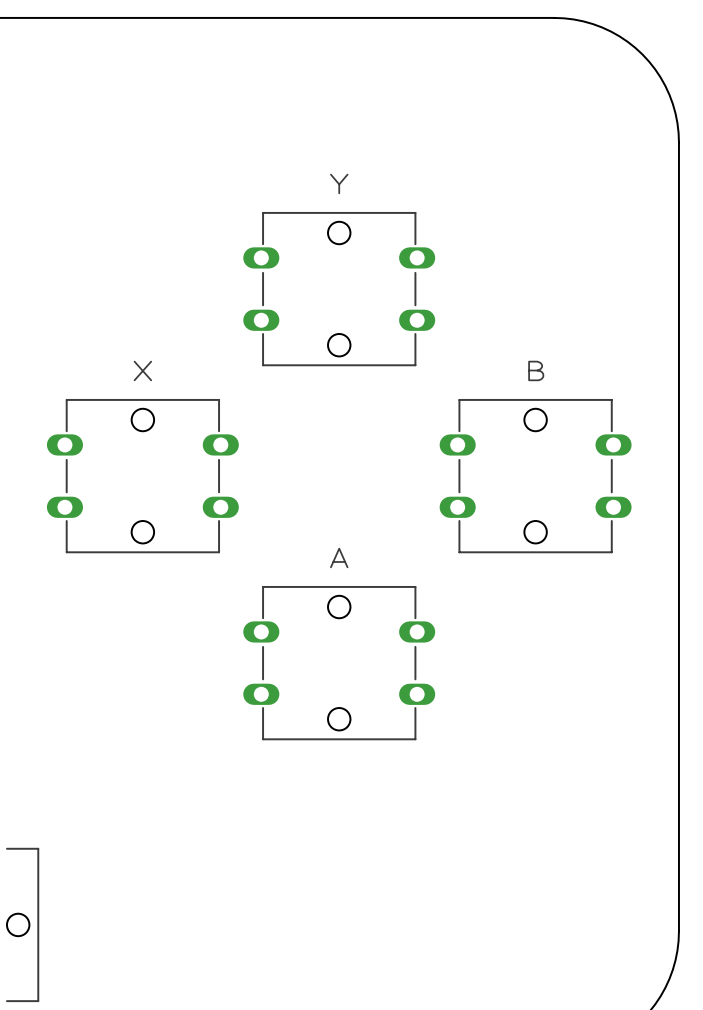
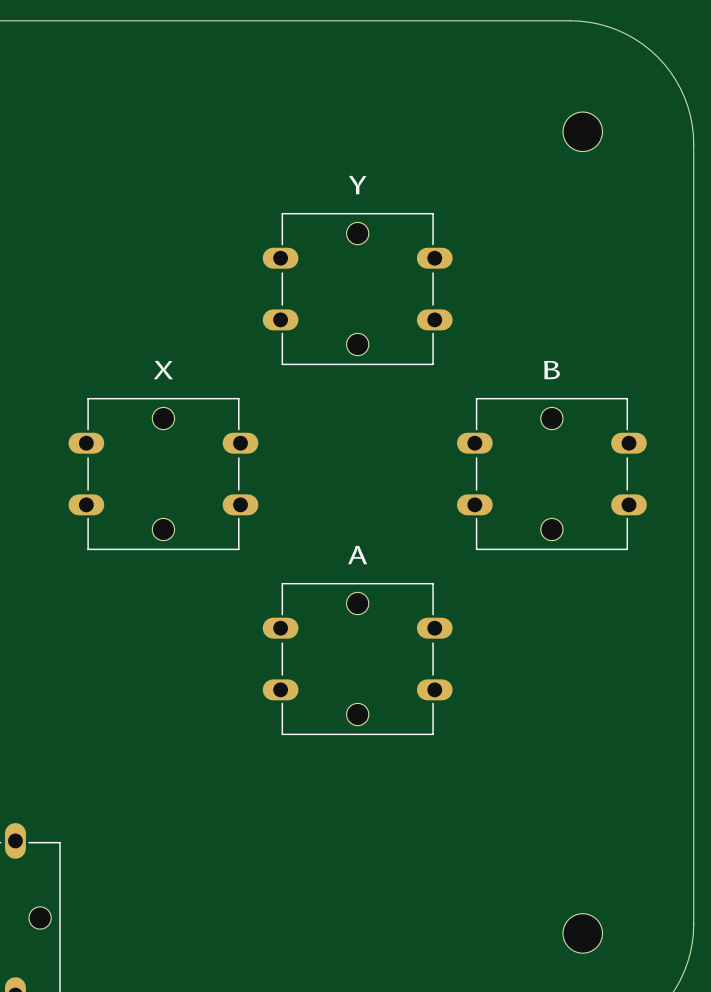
part: none -> (582, 131)
part: none -> (582, 933)

